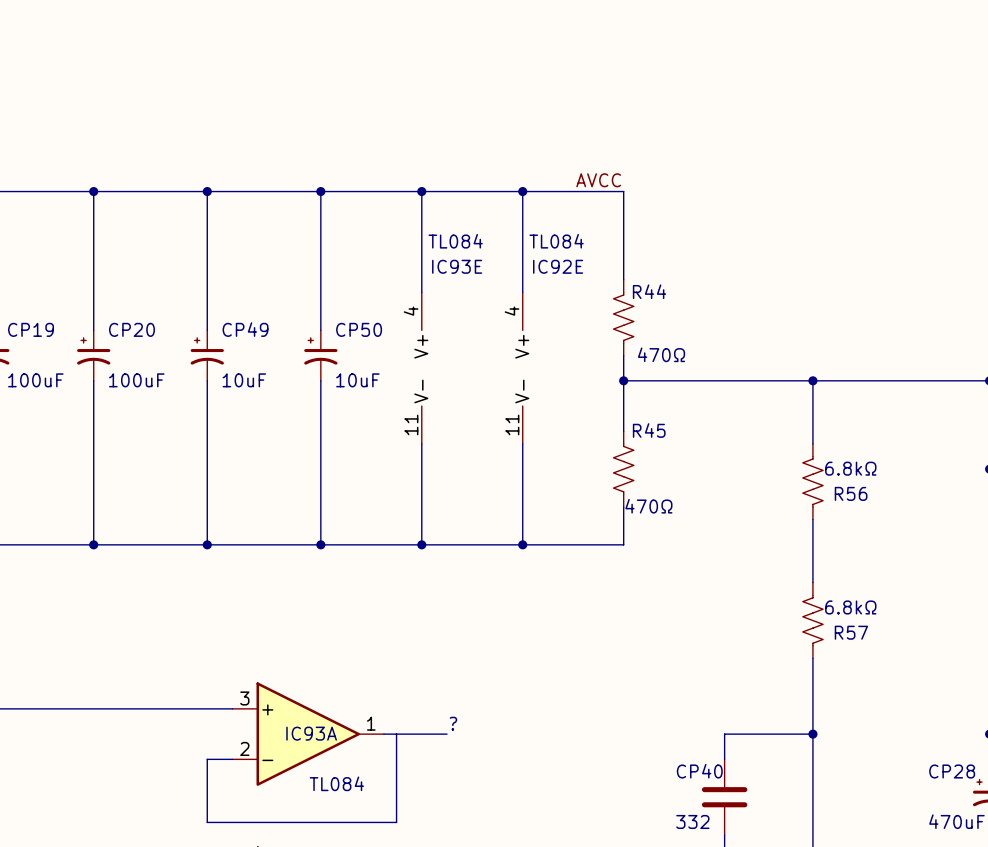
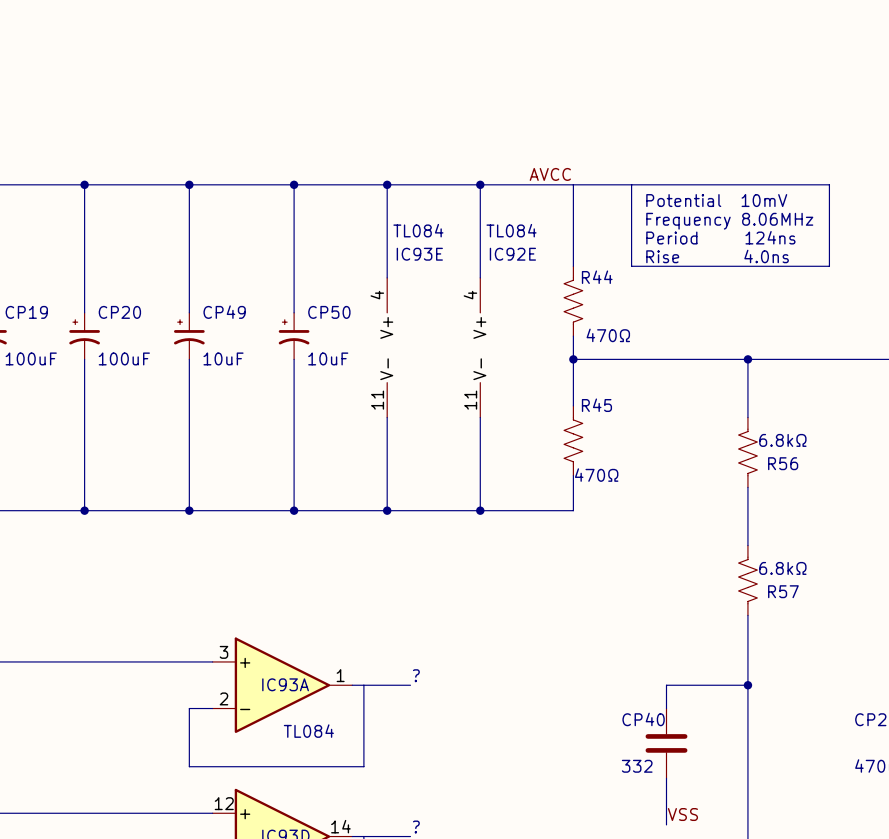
line: none -> (573, 184) (829, 184) (829, 266) (631, 266) (631, 184)
text: none -> Potential 10mV (716, 200)
text: none -> Frequency 8.06MHz (729, 221)
text: none -> Period 124ns (720, 237)
text: none -> Rise 4.0ns (717, 256)

